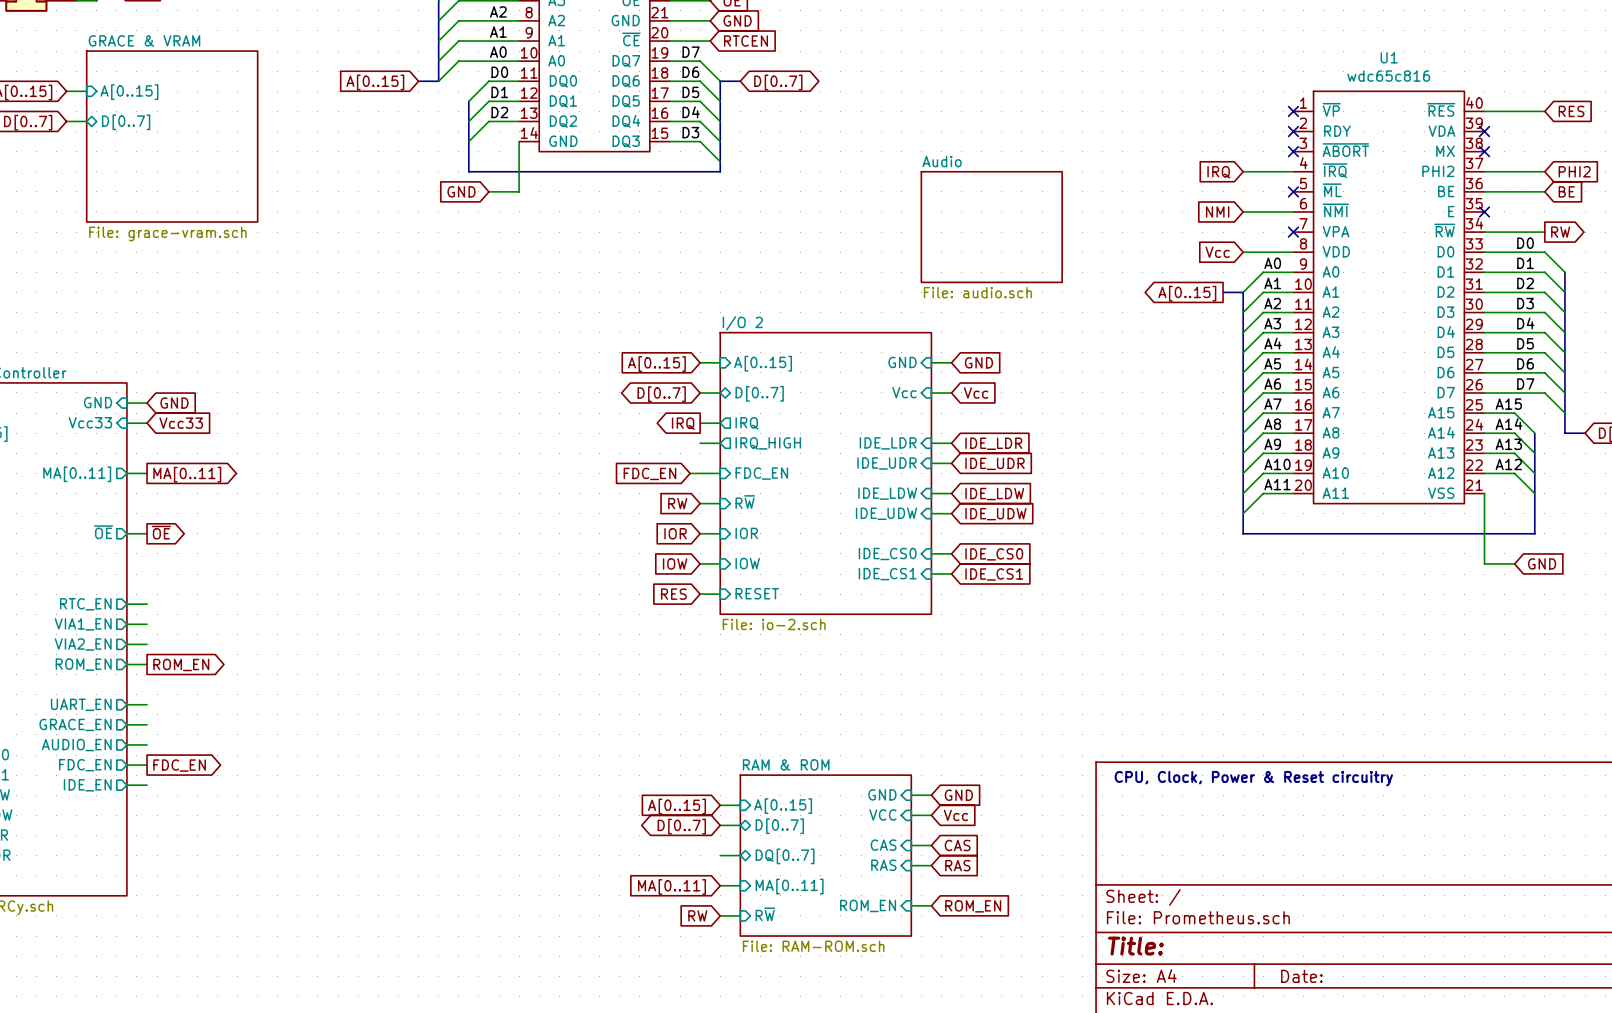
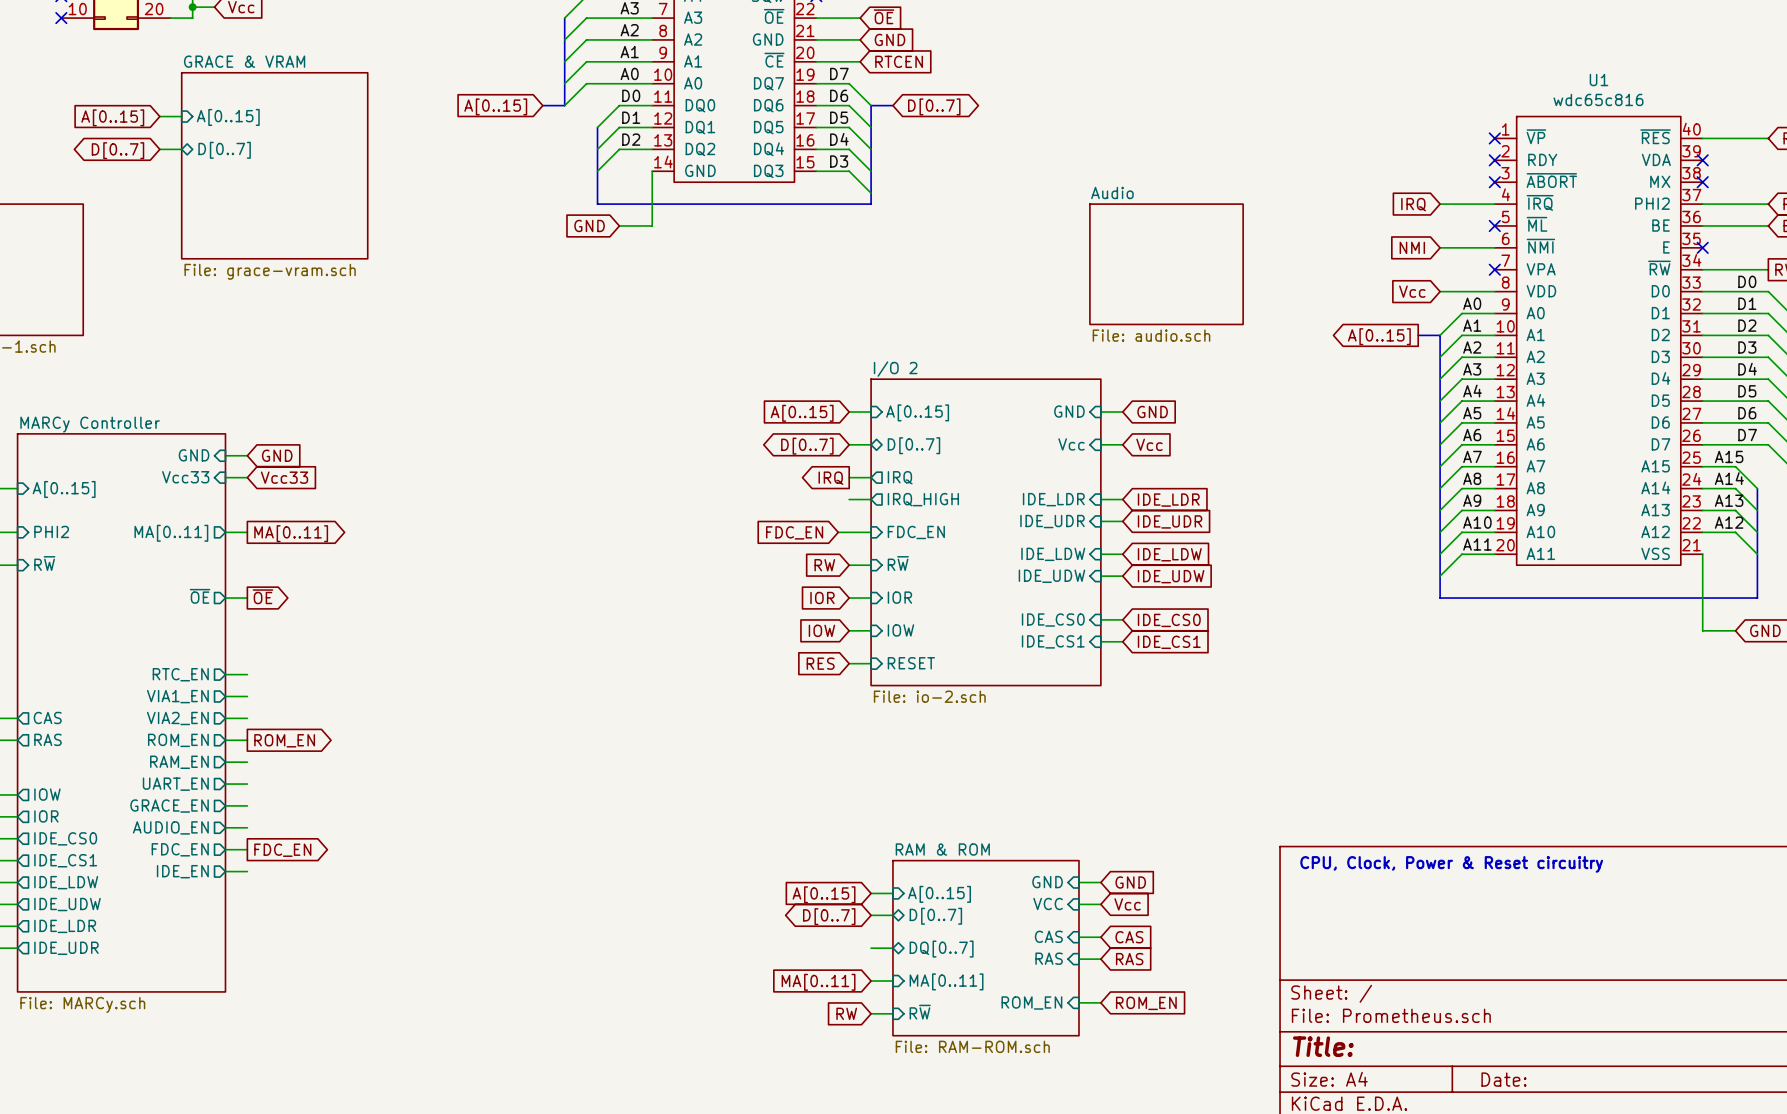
sheet pin: none -> RAM_EN (179, 762)
wire: none -> (225, 762) (247, 762)

